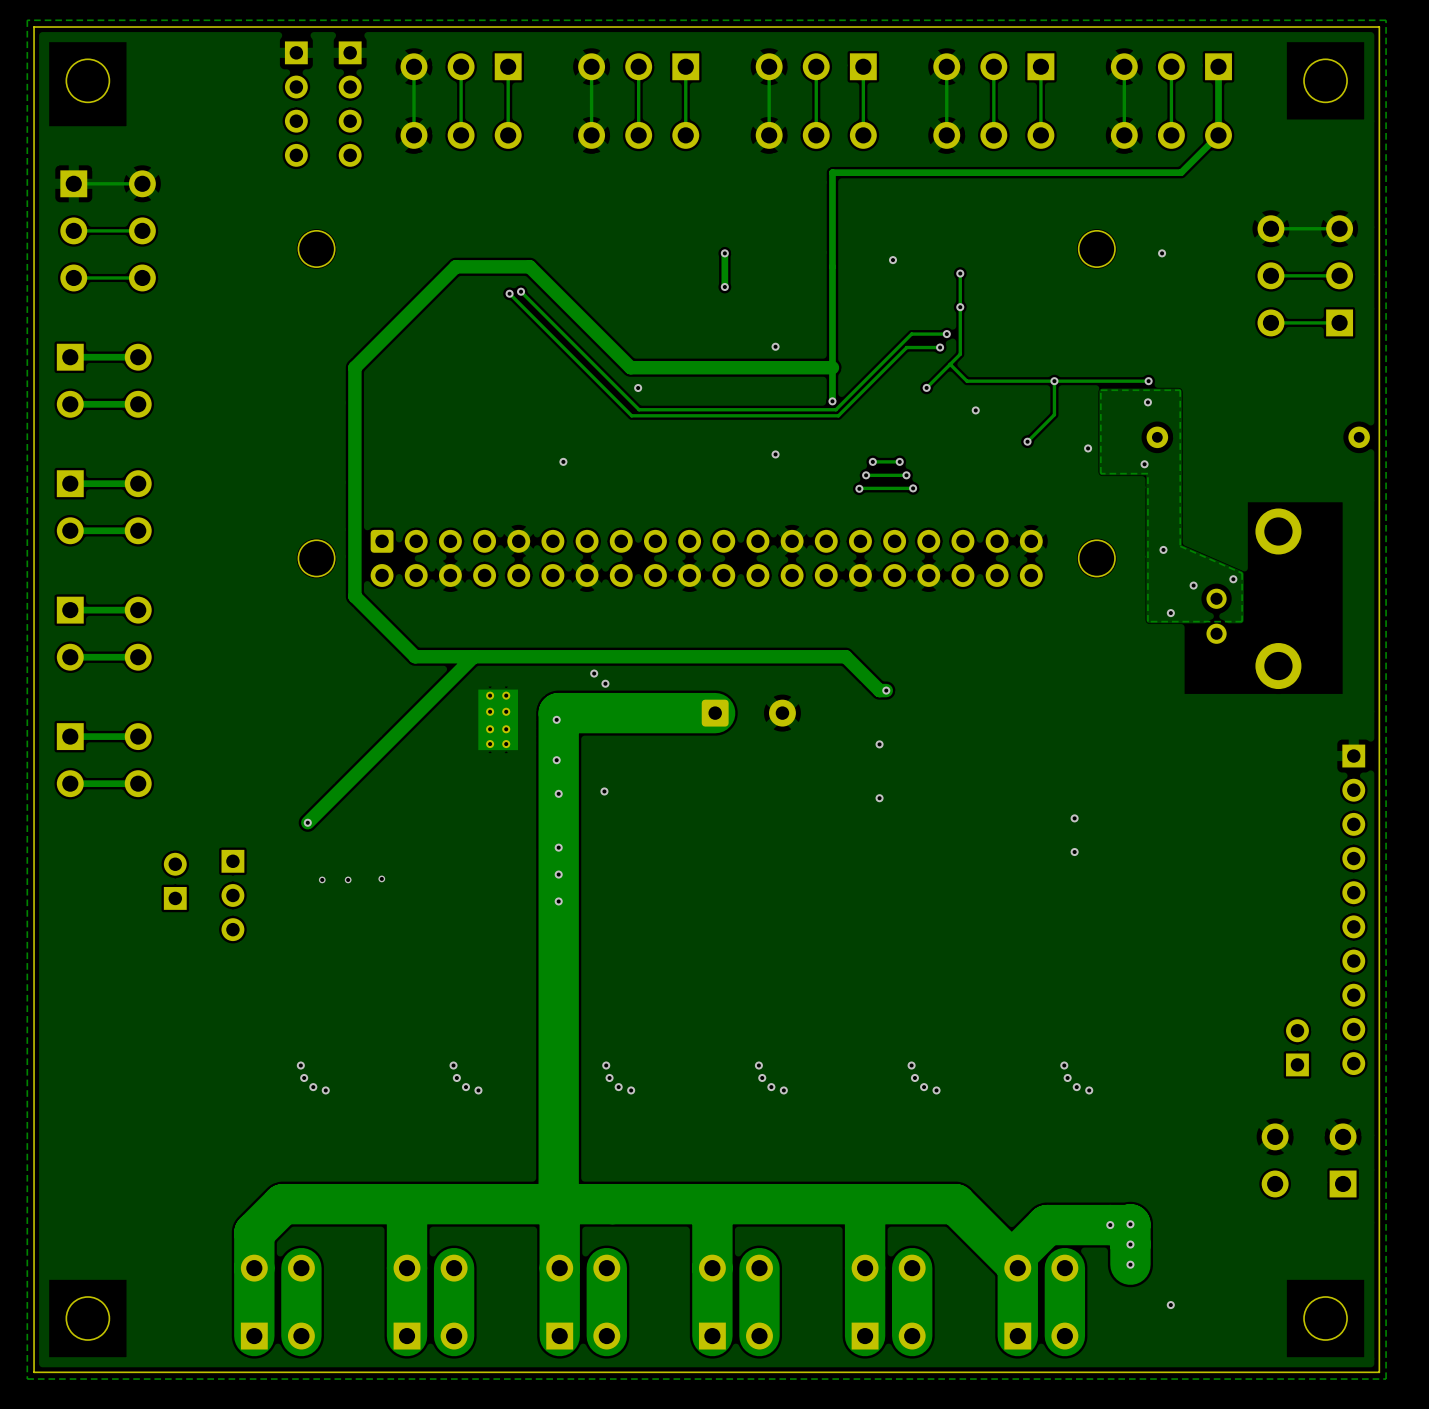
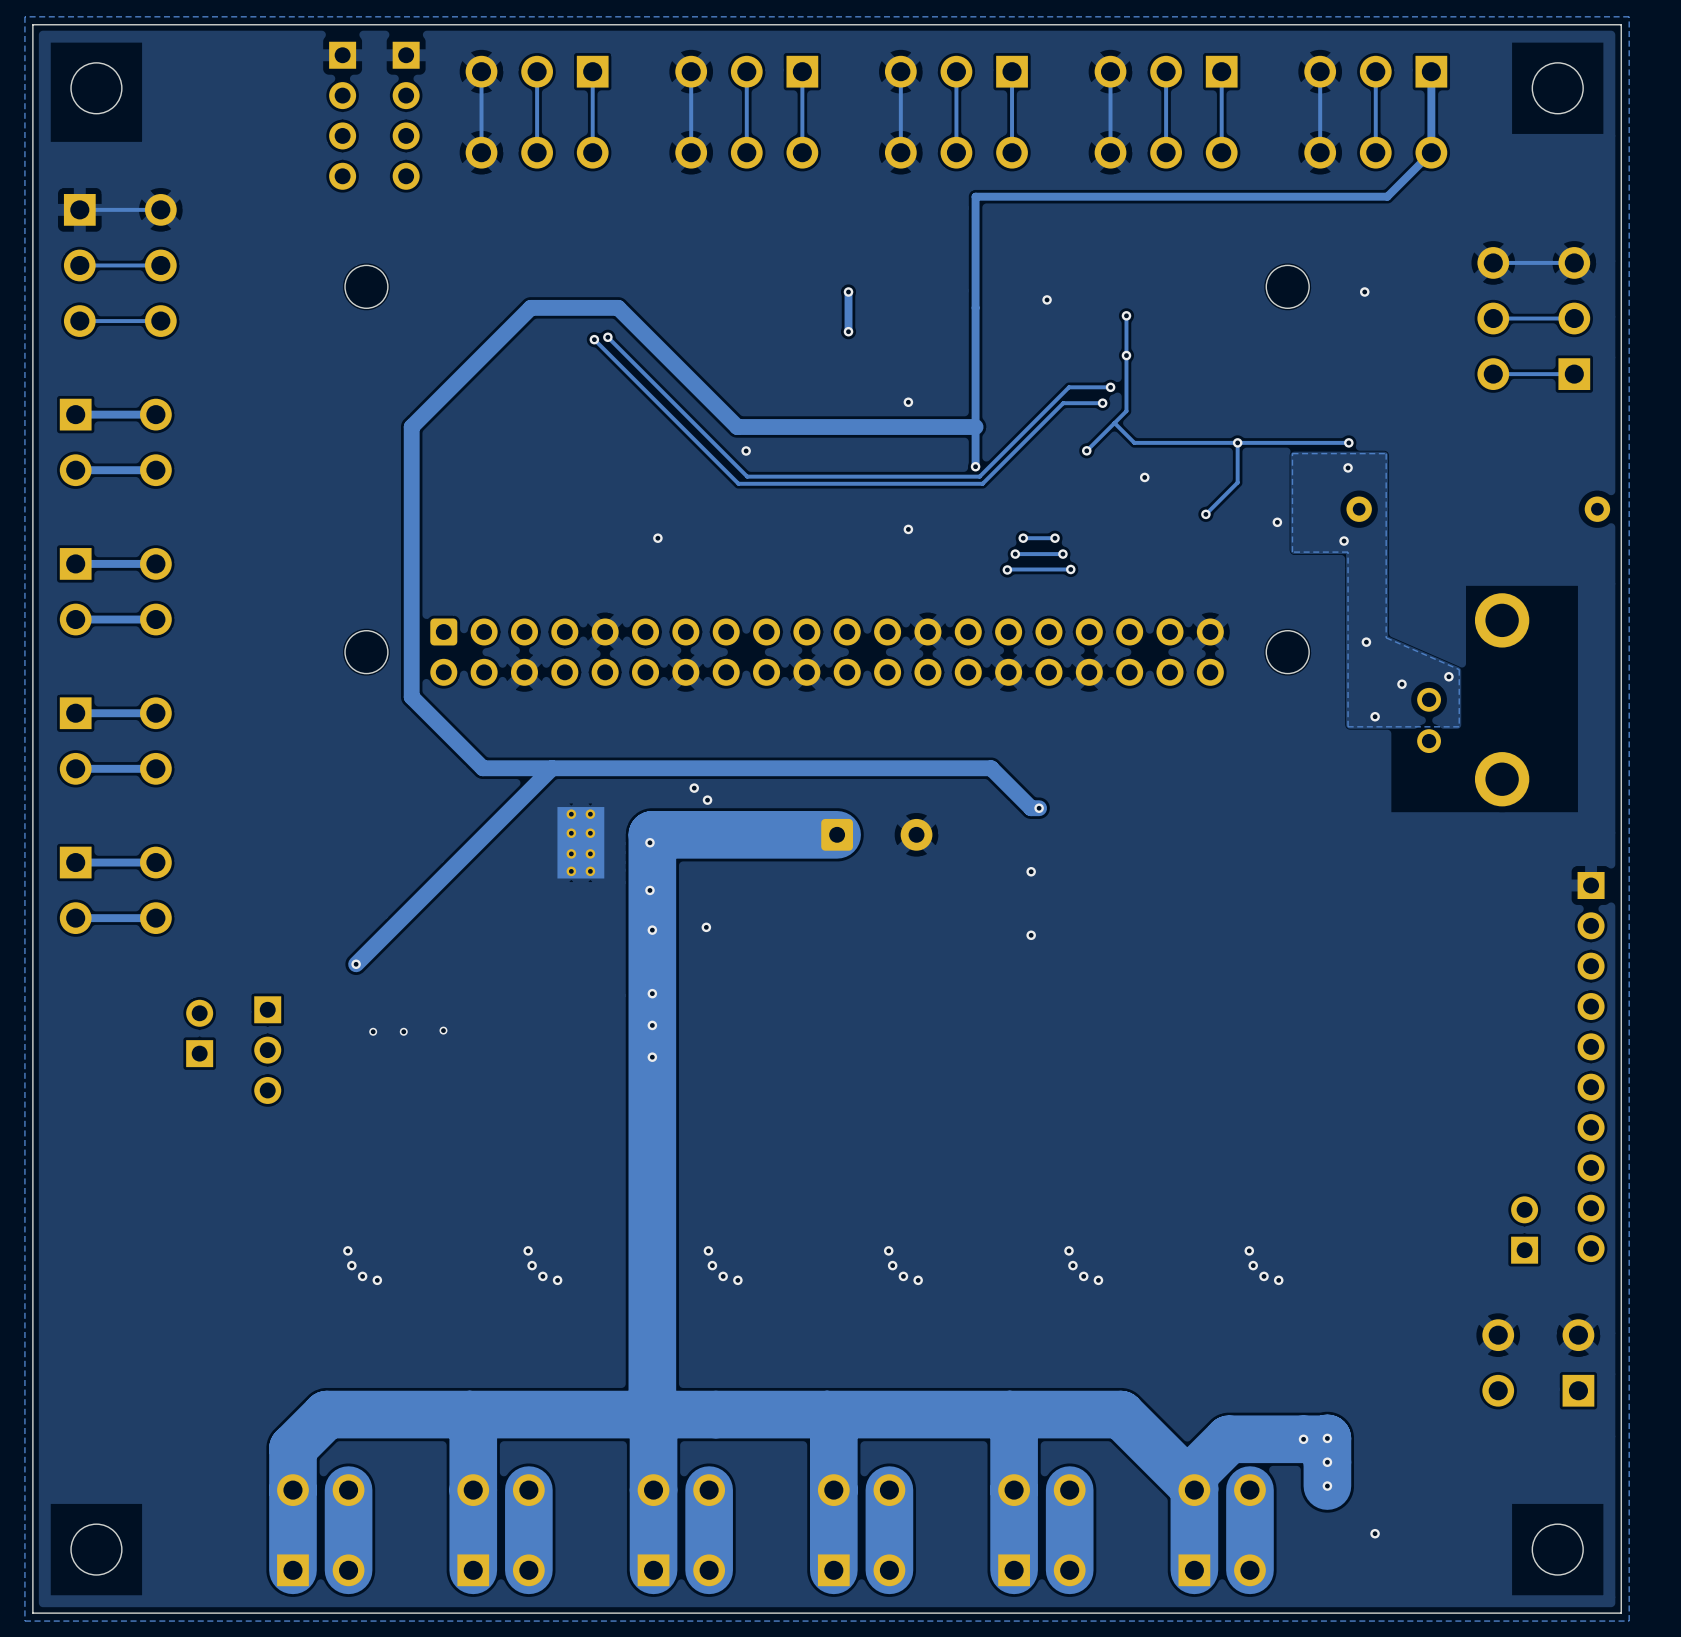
via: (1074, 818) -> none
via: (1074, 852) -> none

